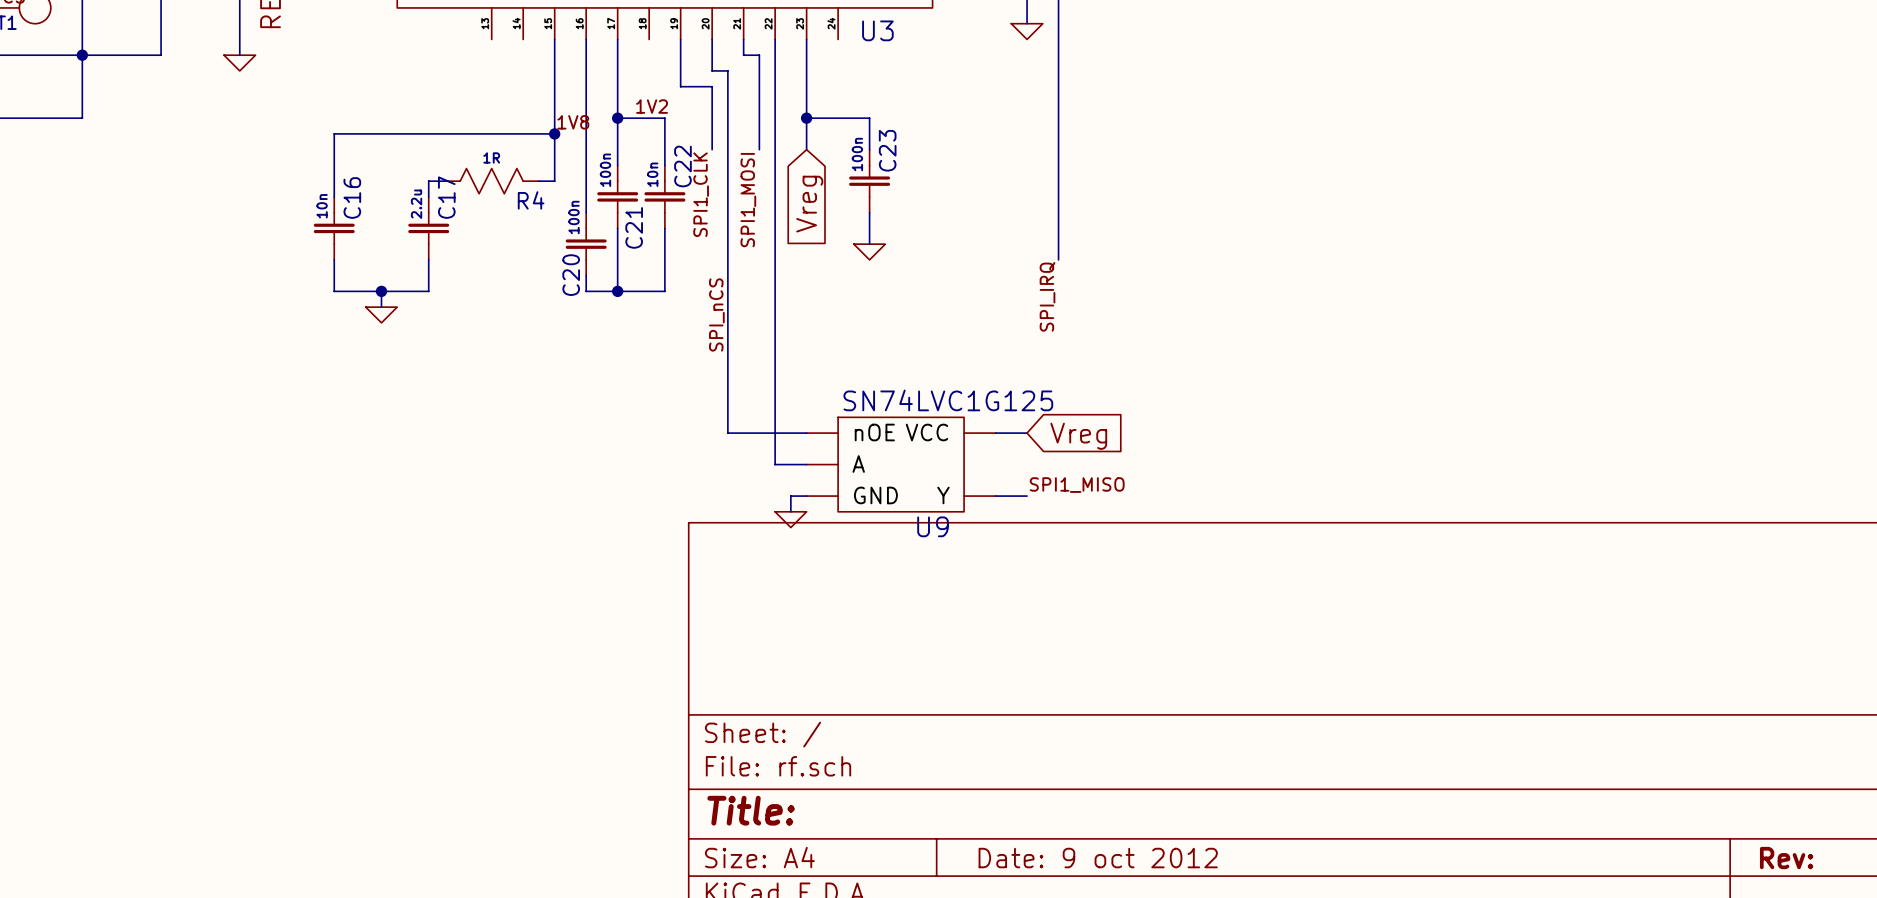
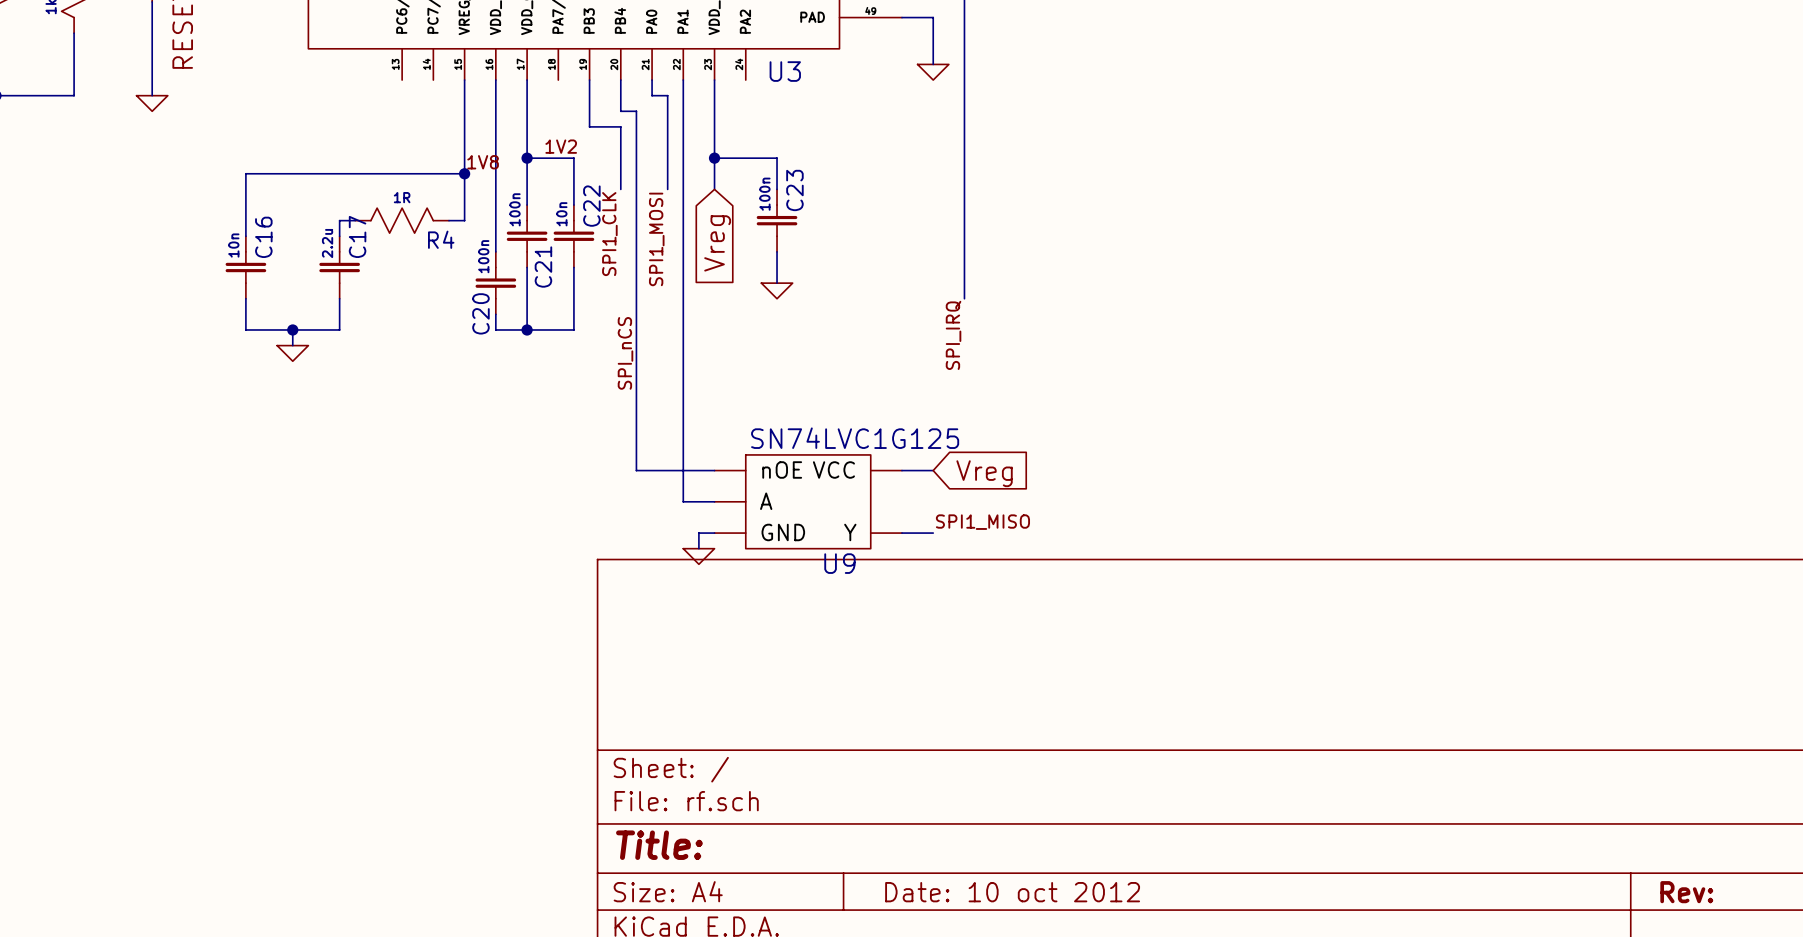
title block: Date: 9 oct 2012 (1098, 858) -> Date: 10 oct 2012 (1012, 892)

